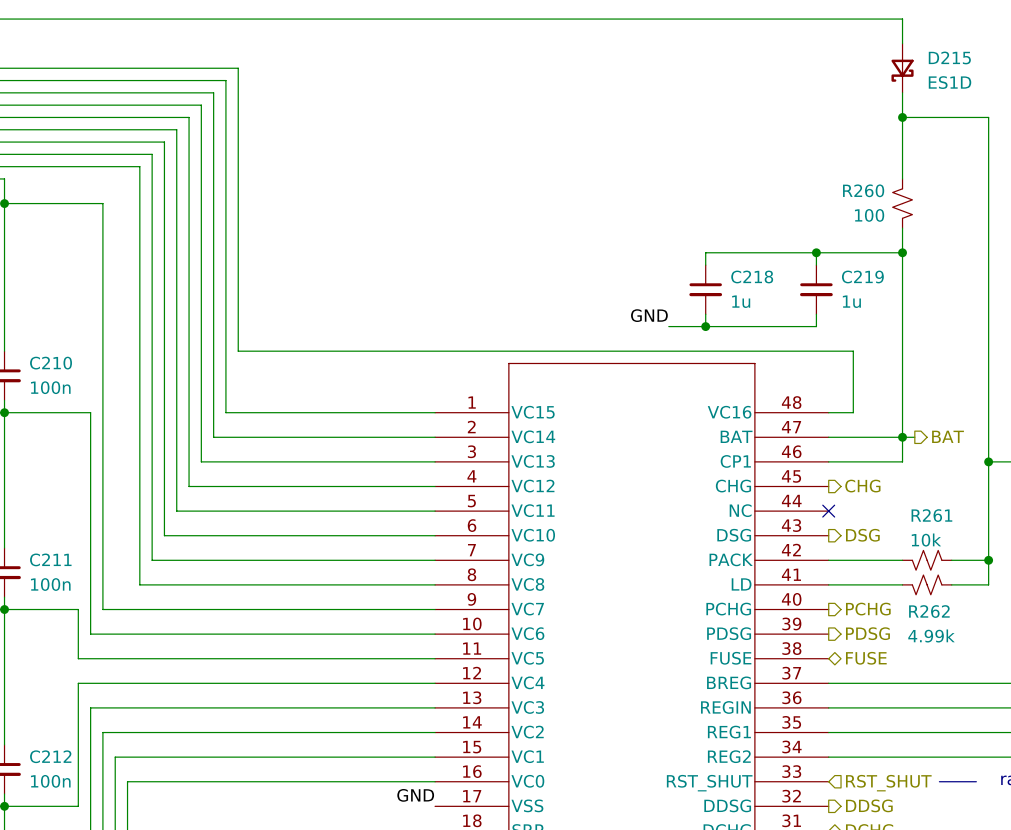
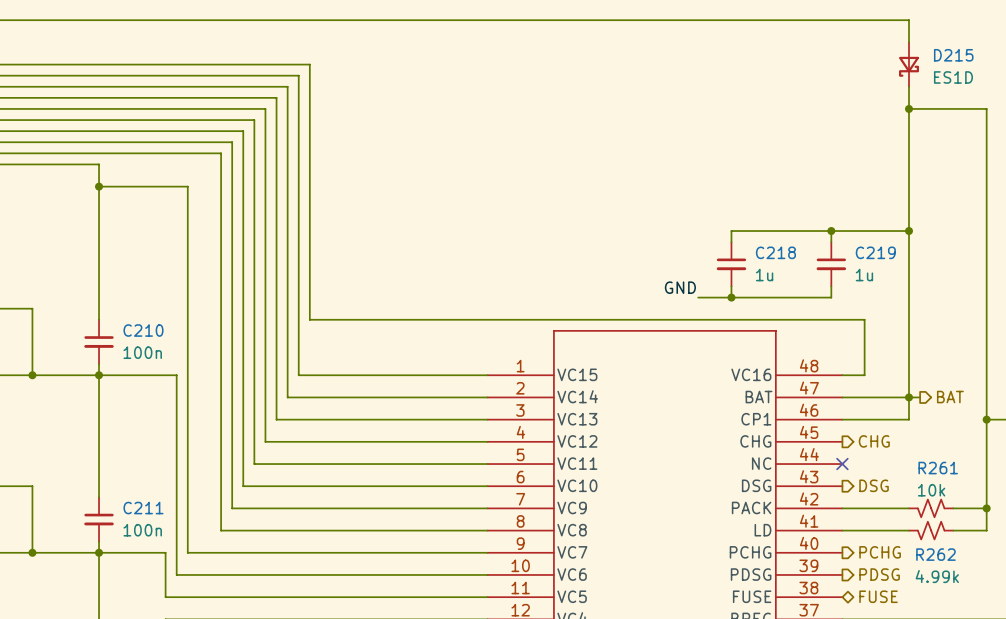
R260: 100 (902, 203) -> none

